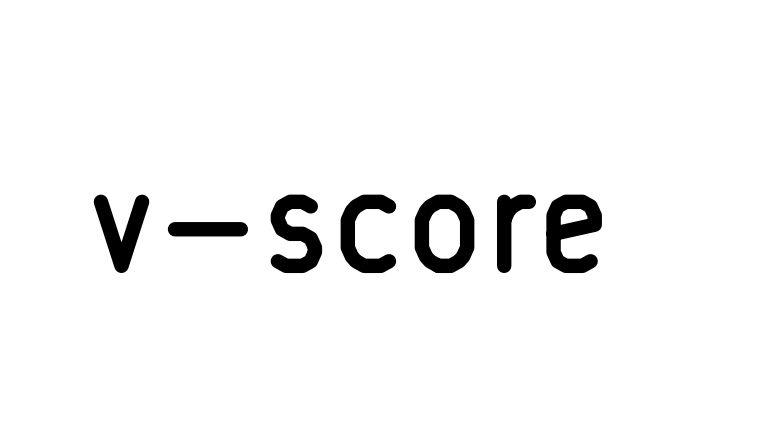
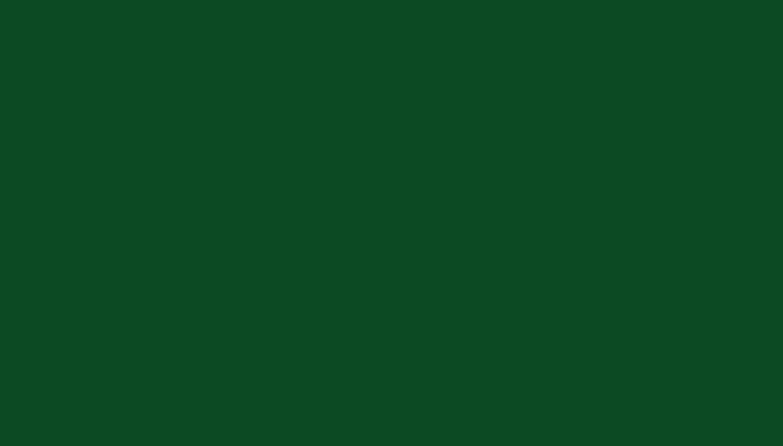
text: v-score (347, 233) -> none

